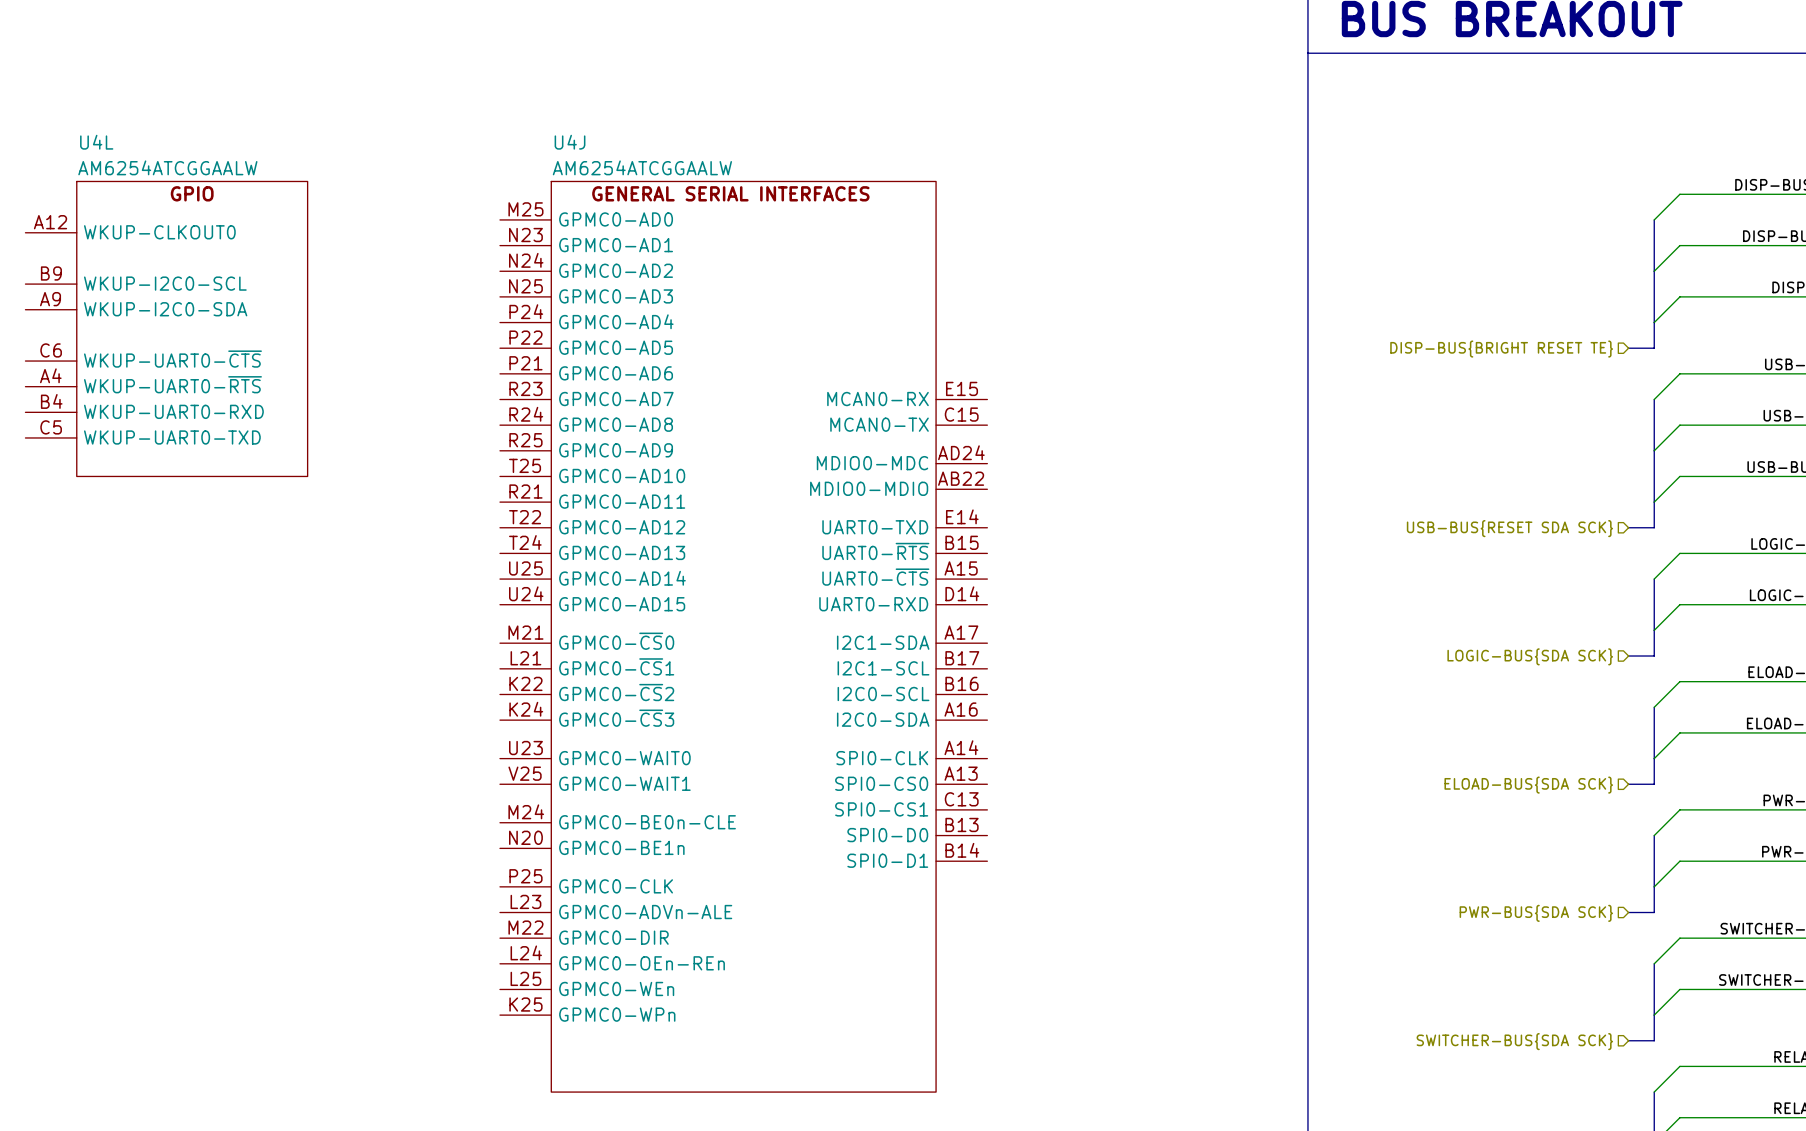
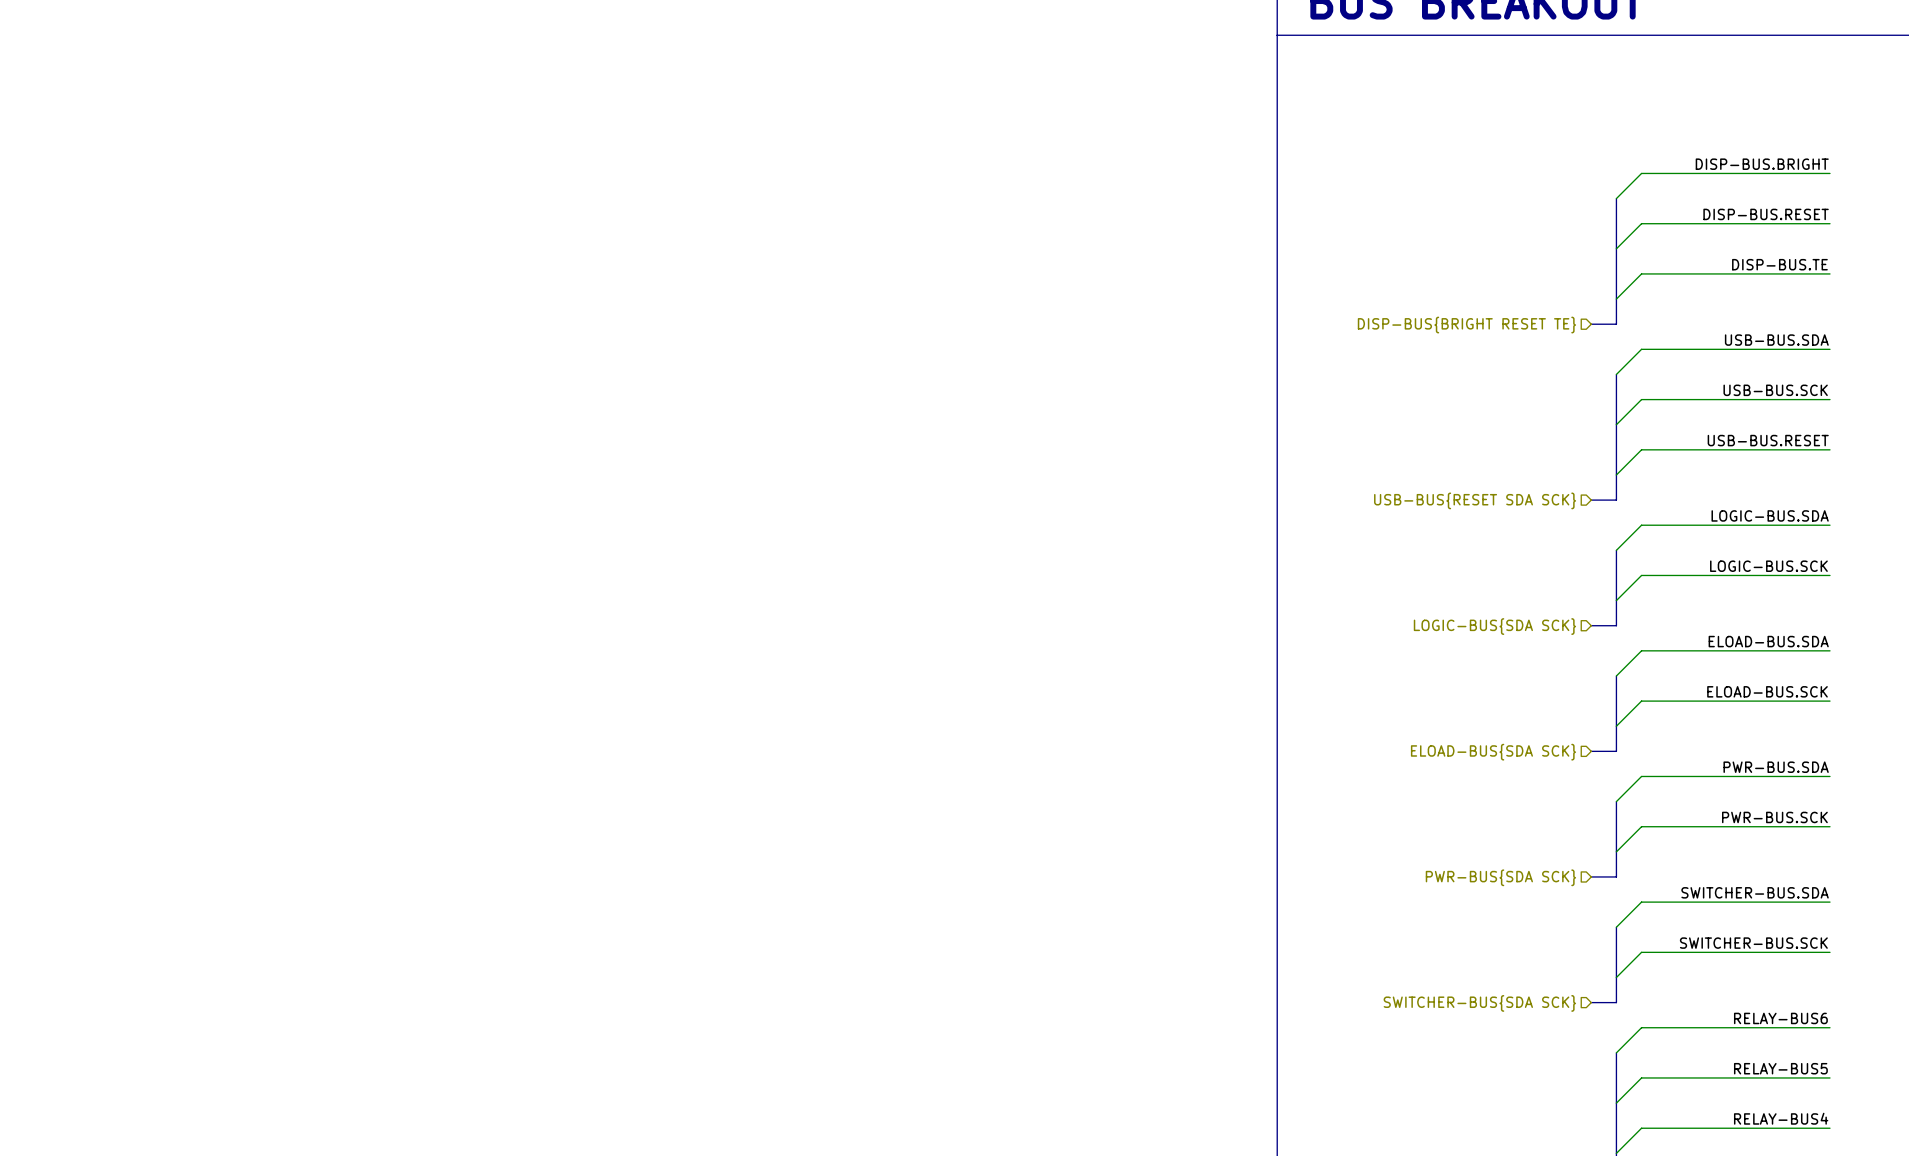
U4L: AM6254ATCGGAALW (166, 328) -> none
U4J: AM6254ATCGGAALW (743, 636) -> none

